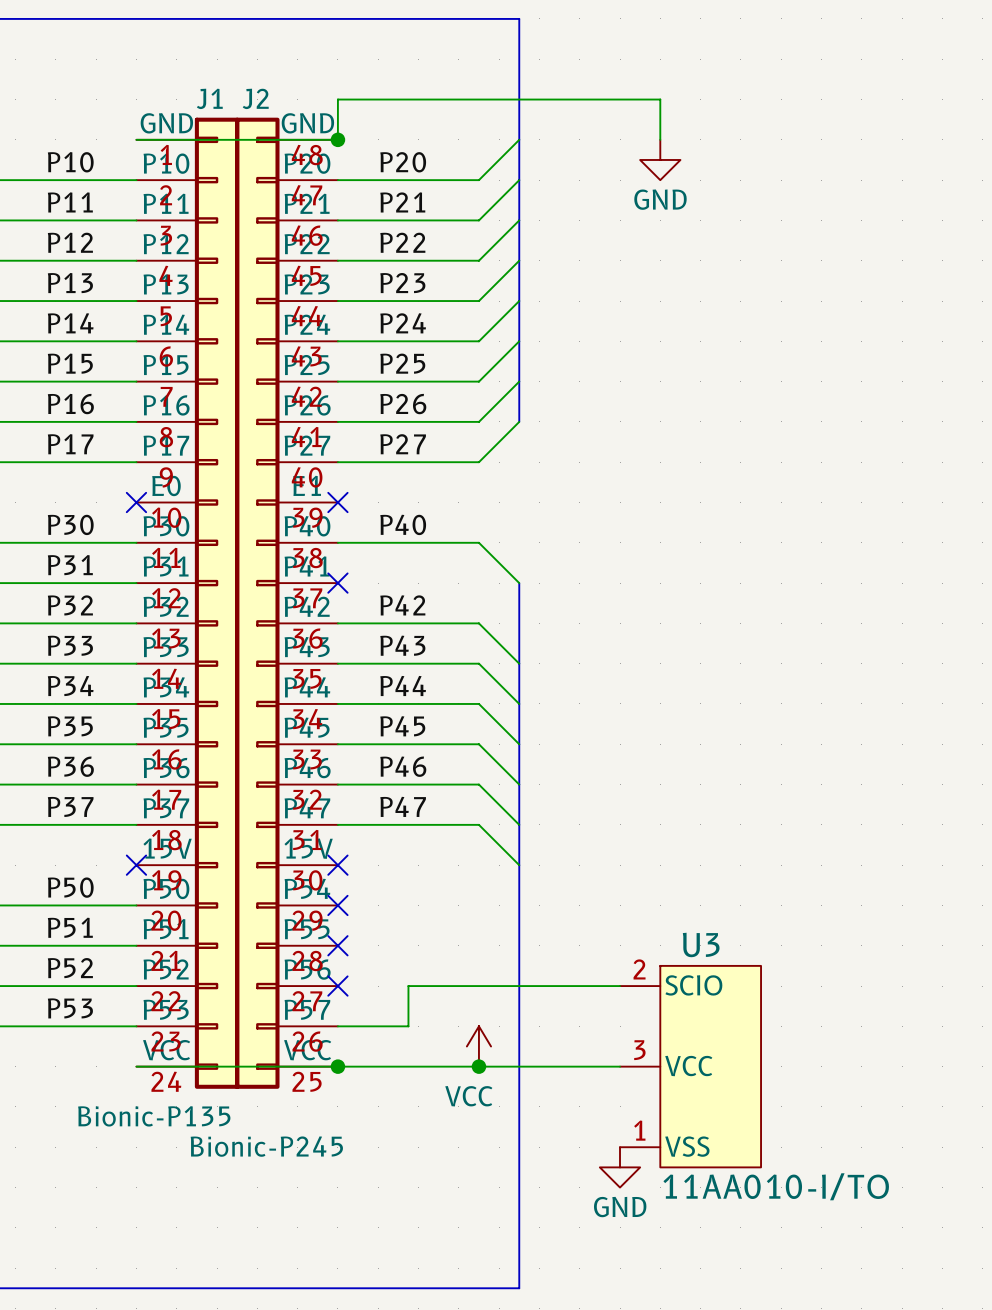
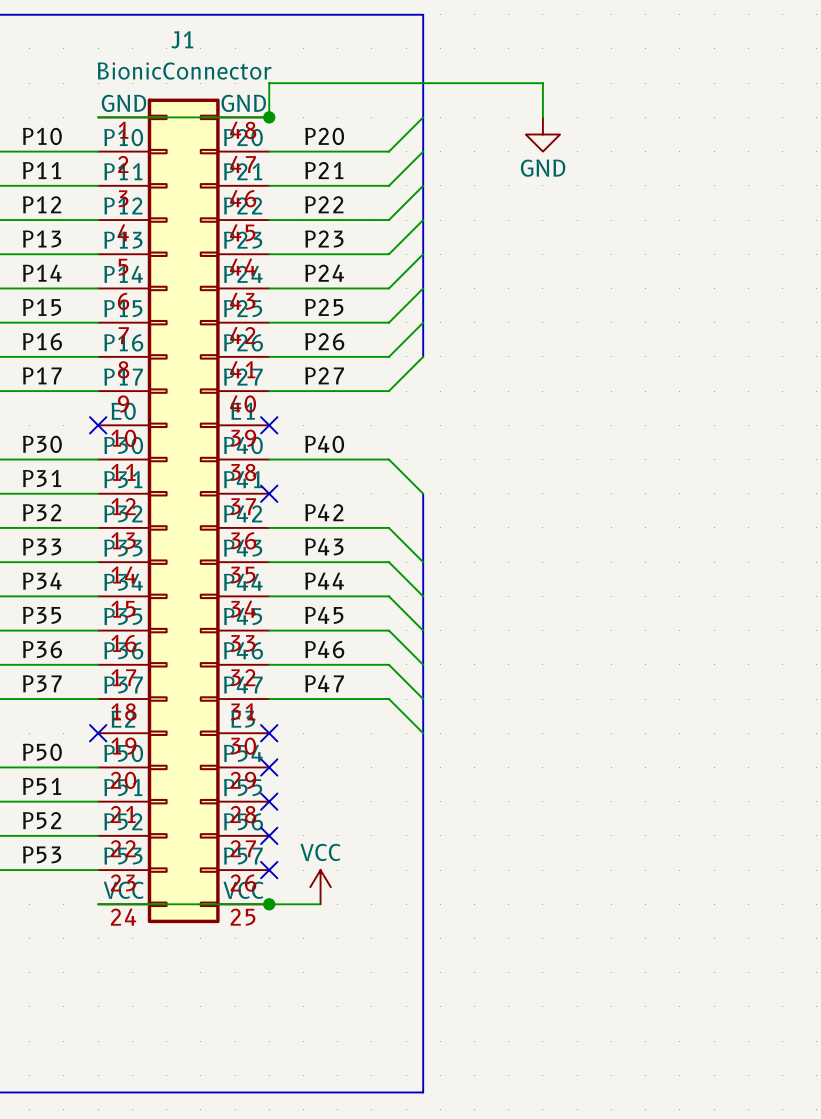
J1 name position: J1 (209, 98) -> J1 (182, 39)
J1 symbol: [136, 117, 240, 1089] -> [98, 98, 270, 924]
J2: Bionic-P245 (286, 603) -> none
wire: (620, 986) (408, 986) (408, 1026) (337, 1026) -> none
no-connect mark: none -> (269, 870)
power symbol position: VCC (478, 1046) -> VCC (320, 887)
wire: (398, 1066) (620, 1066) -> none
junction: (478, 1066) -> none
U3: 11AA010-I/TO (690, 1066) -> none
power symbol text position: VCC (468, 1096) -> VCC (320, 852)
J1 value: Bionic-P135 (154, 1116) -> BionicConnector (184, 71)
power symbol: GND (620, 1167) -> none

